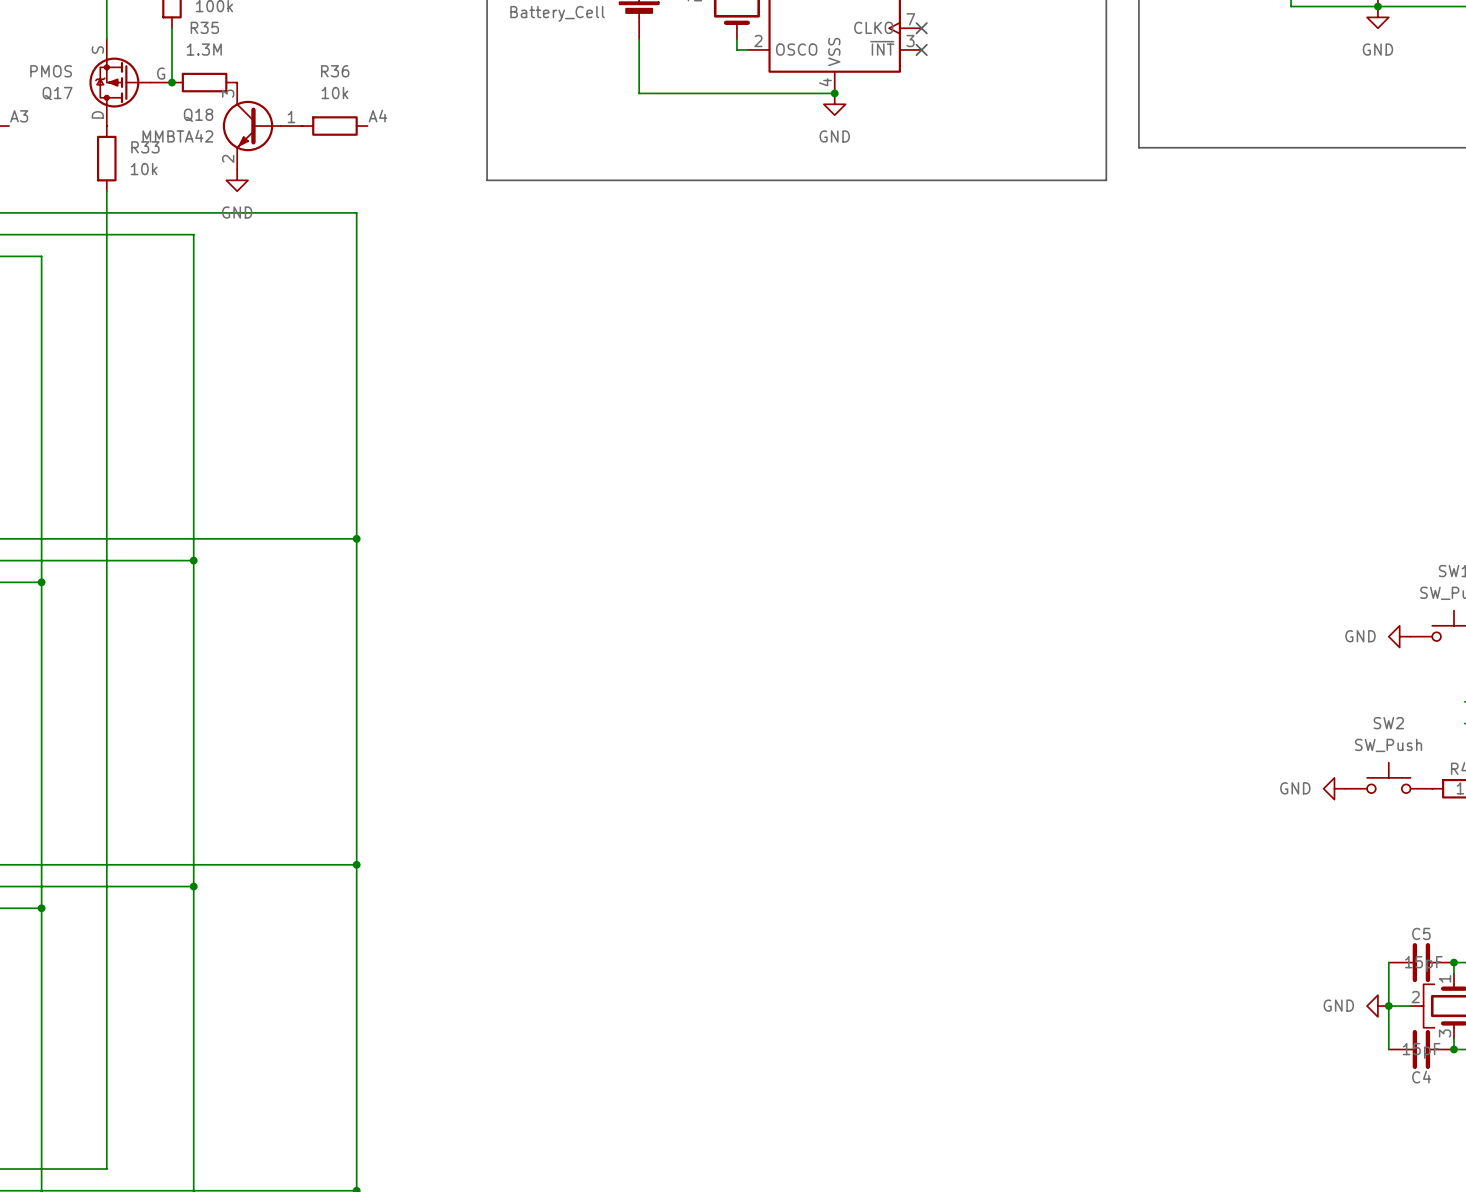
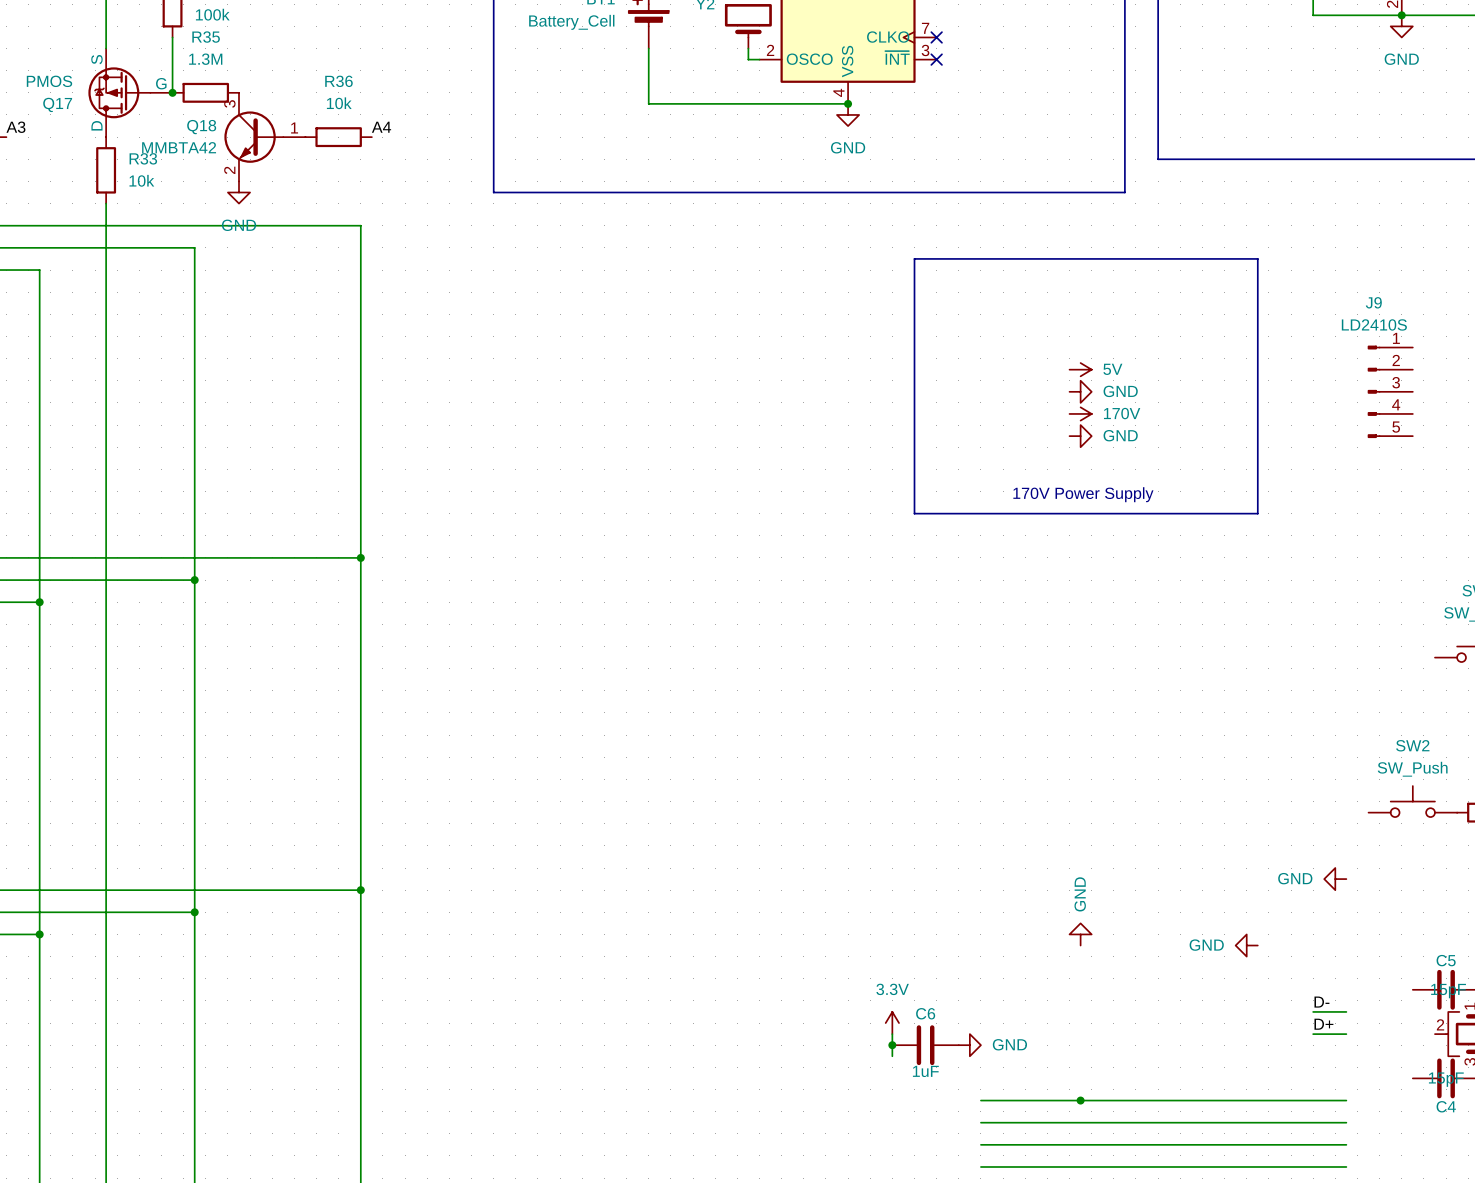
line: none -> (914, 258) (1257, 258) (1257, 513) (914, 513) (914, 258)
power symbol: none -> 5V (1080, 369)
power symbol: none -> GND (1080, 391)
J9: none -> LD2410S (1390, 391)
power symbol: none -> 170V (1080, 413)
power symbol: none -> GND (1080, 436)
text: none -> 170V Power Supply (1083, 494)
power symbol: GND (1399, 636) -> none
power symbol position: GND (1334, 788) -> GND (1335, 879)
power symbol: none -> GND (1080, 934)
power symbol: none -> GND (1246, 945)
wire: (1388, 962) (1388, 1049) -> none
label: none -> D- (1321, 1002)
wire: none -> (1313, 1011) (1346, 1011)
power symbol: none -> 3.3V (892, 1023)
label: none -> D+ (1323, 1024)
wire: none -> (892, 1034) (892, 1056)
wire: none -> (1313, 1034) (1346, 1034)
power symbol: GND (1377, 1006) -> none
wire: (1388, 1006) (1410, 1006) -> none
junction: (1388, 1006) -> none
junction: none -> (892, 1045)
C6: none -> 1uF (925, 1045)
power symbol: none -> GND (969, 1045)
wire: none -> (980, 1100) (1346, 1100)
junction: none -> (1080, 1100)
wire: none -> (980, 1122) (1346, 1122)
wire: none -> (980, 1144) (1346, 1144)
wire: none -> (980, 1166) (1346, 1166)

